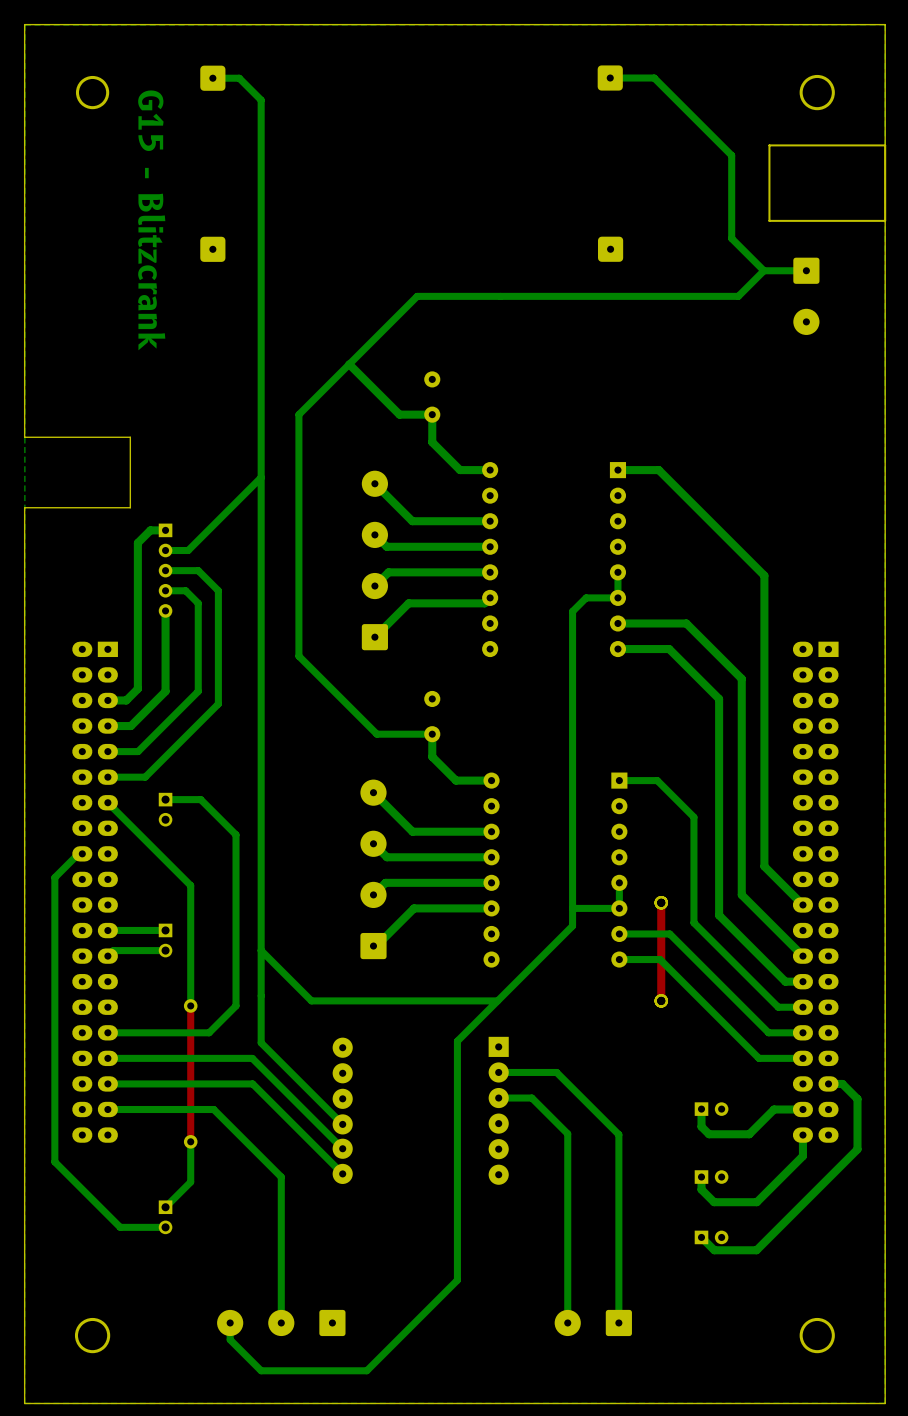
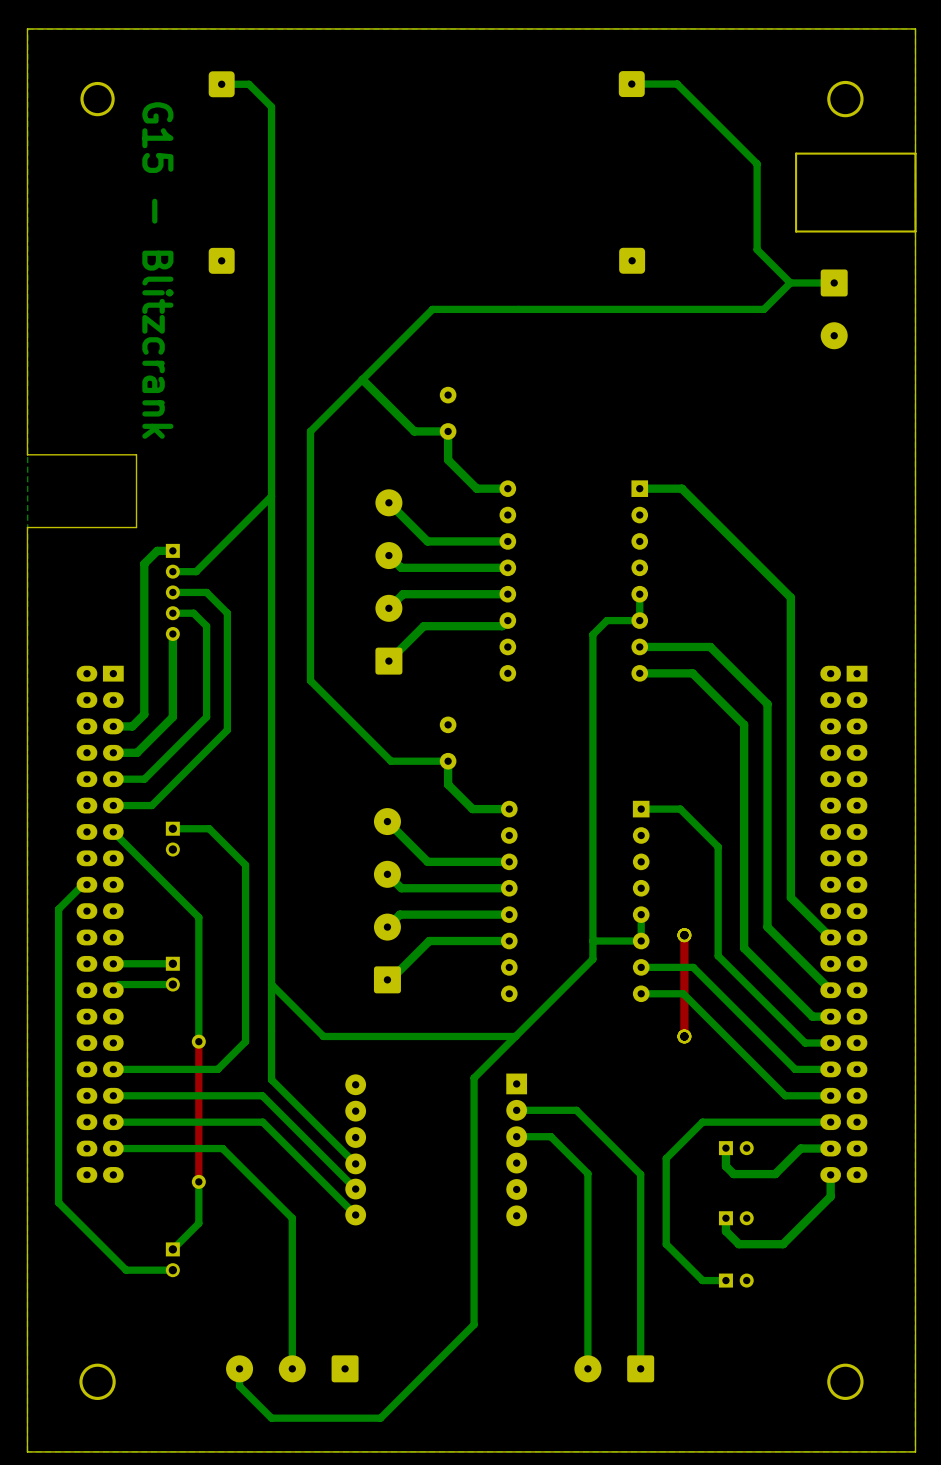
bottom track: (828, 1083) (842, 1083) (857, 1099) (857, 1149) (756, 1250) (714, 1250) (701, 1237) -> (830, 1122) (702, 1122) (666, 1158) (666, 1244) (702, 1280) (725, 1280)

